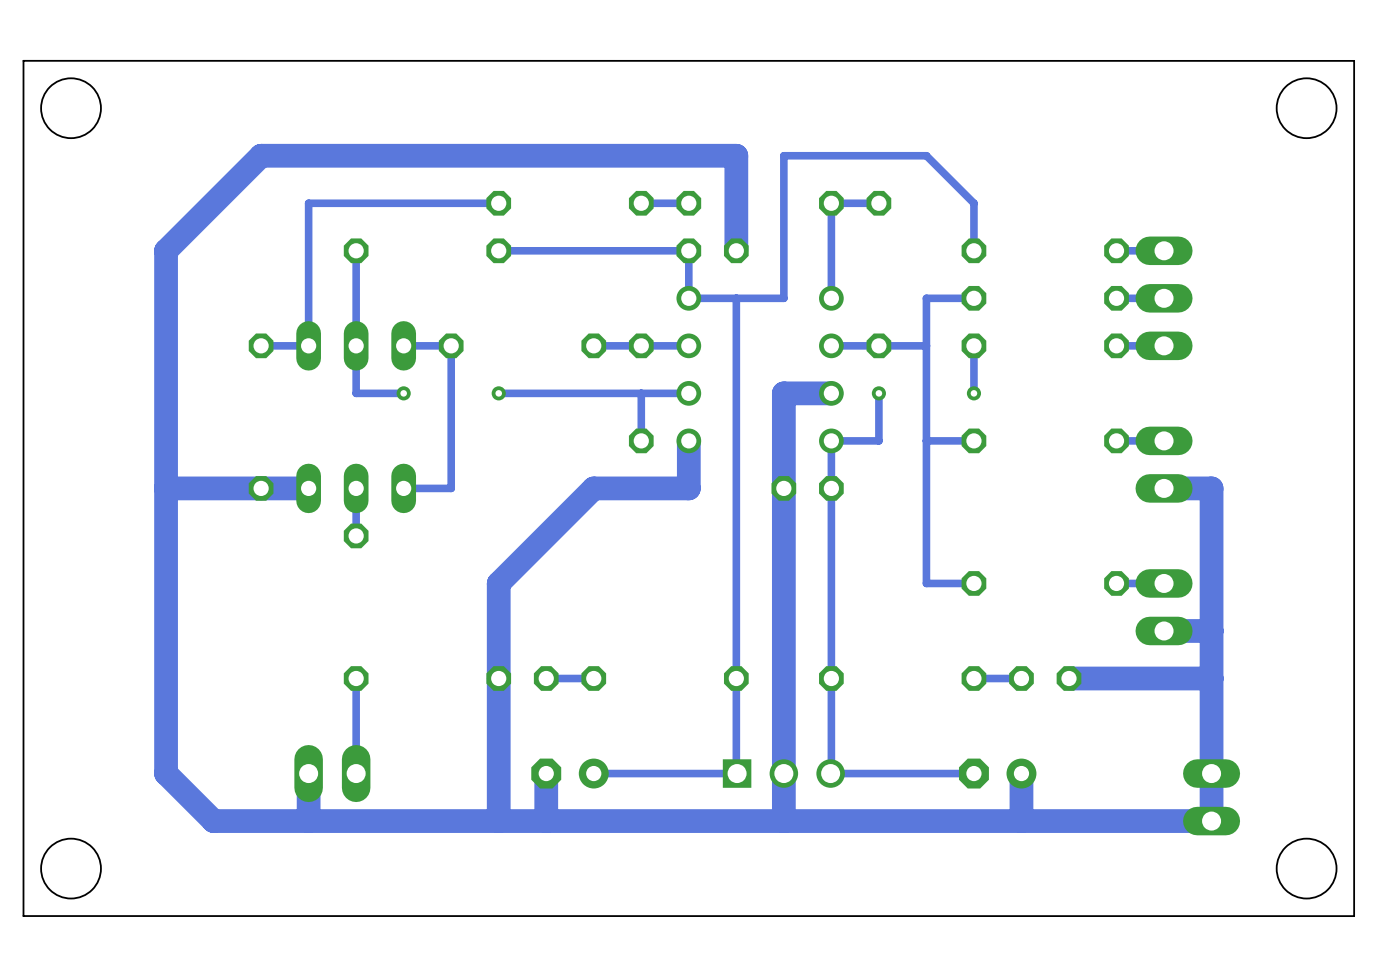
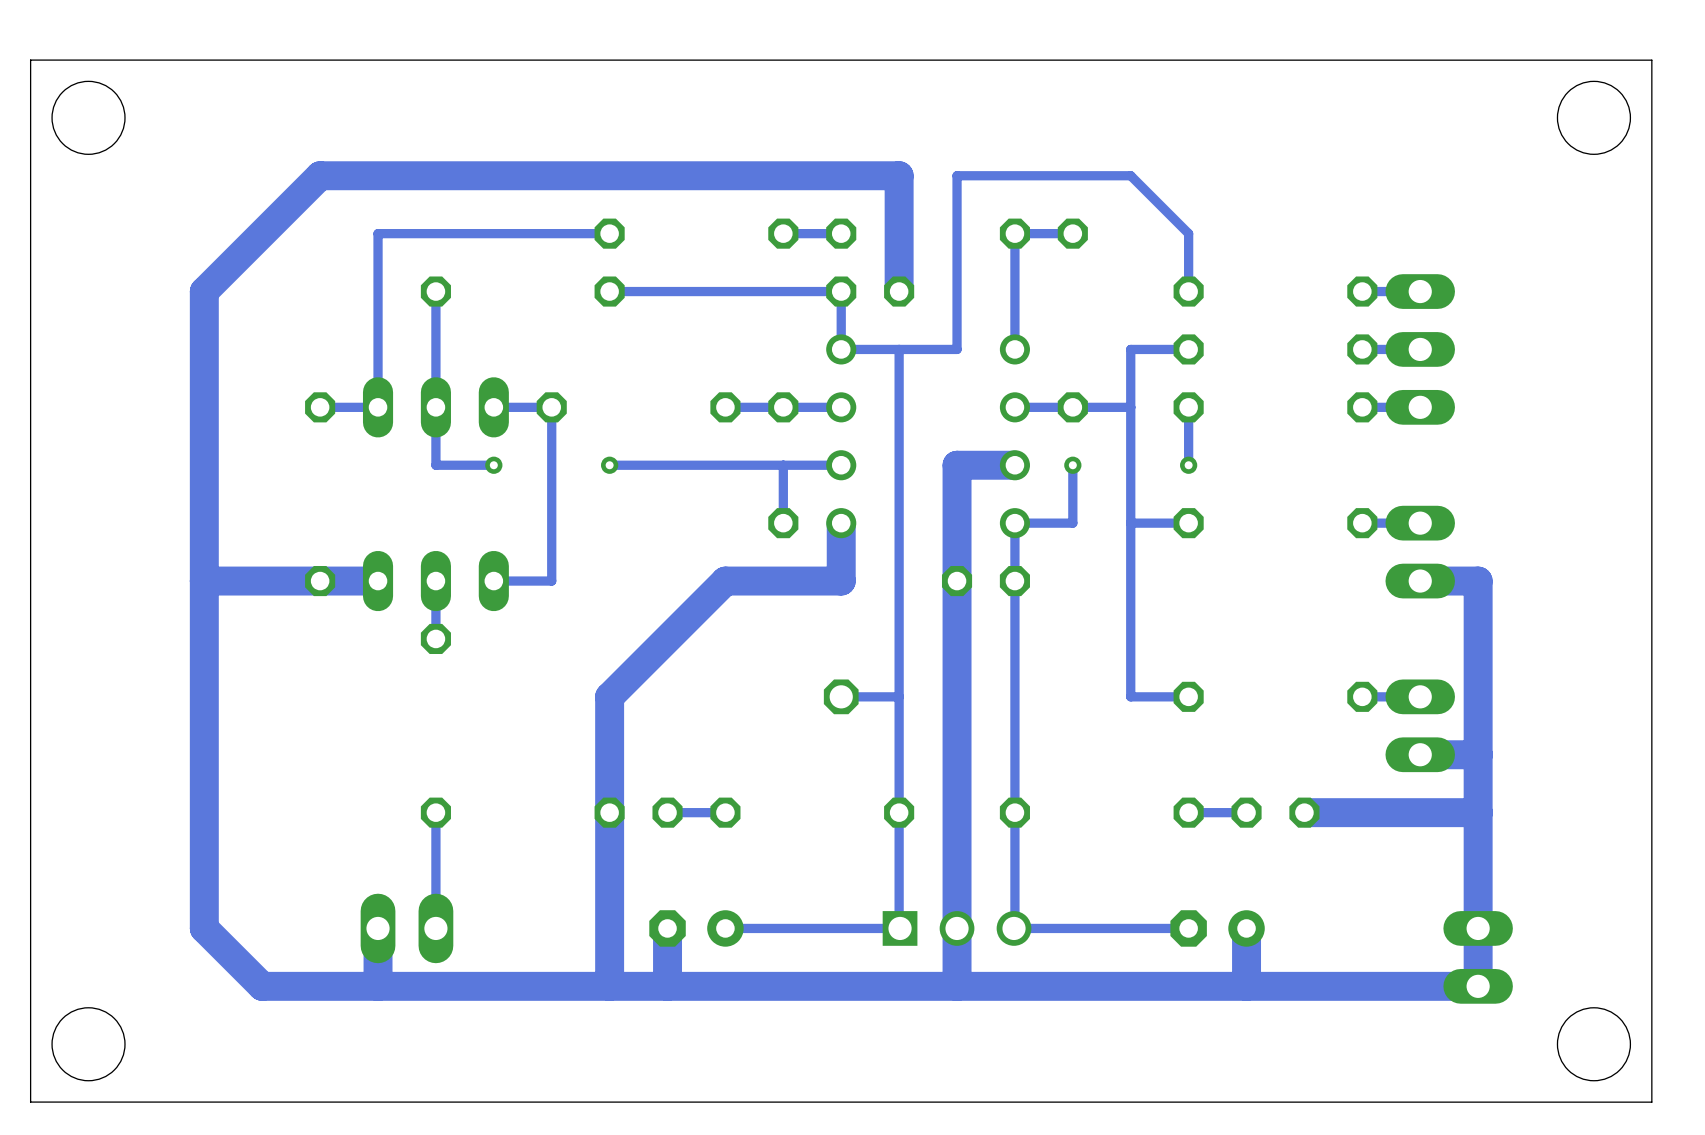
part: none -> (841, 696)
track: none -> (899, 696) (841, 696)

